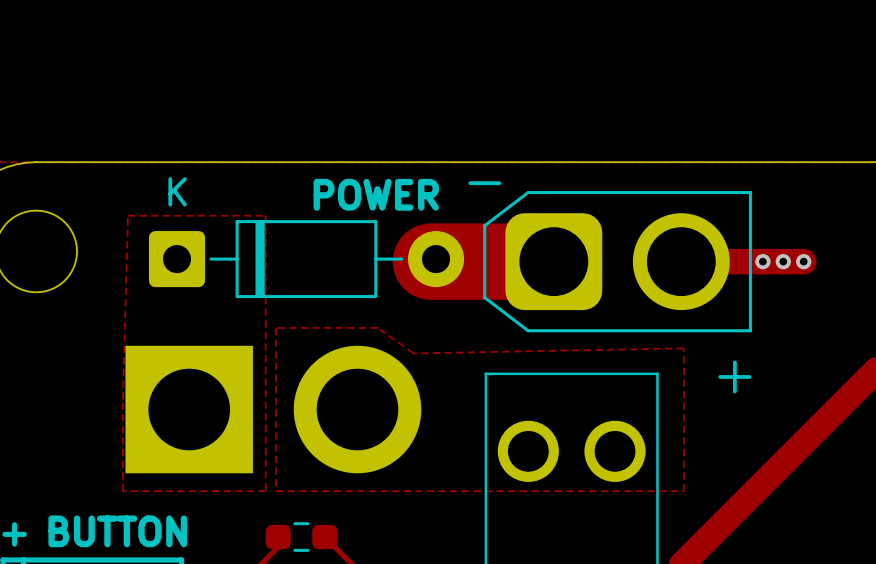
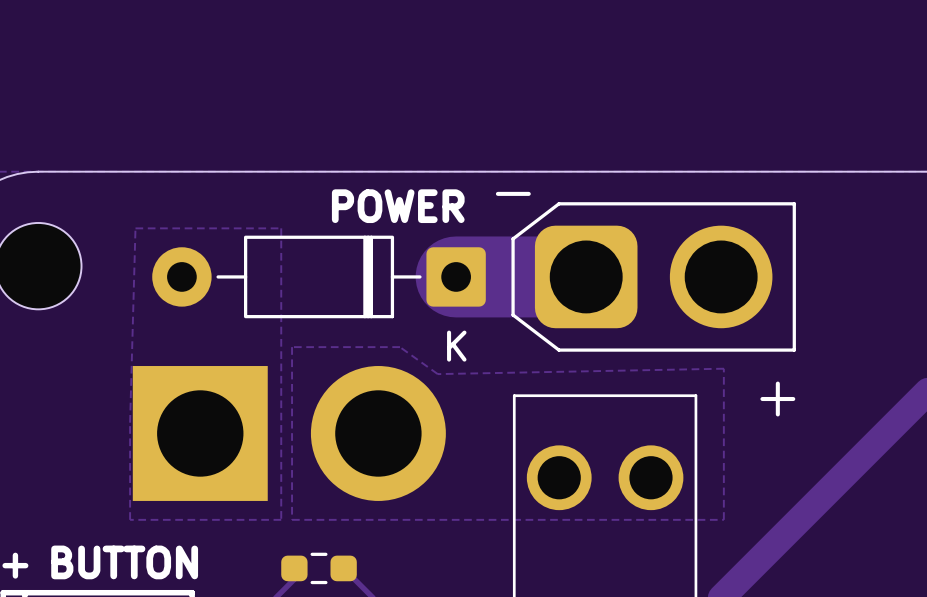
part rotation: 0° (306, 259) -> 180° (319, 276)
track: (681, 261) (803, 261) -> none
via: (762, 261) -> none
via: (783, 261) -> none
via: (803, 261) -> none

